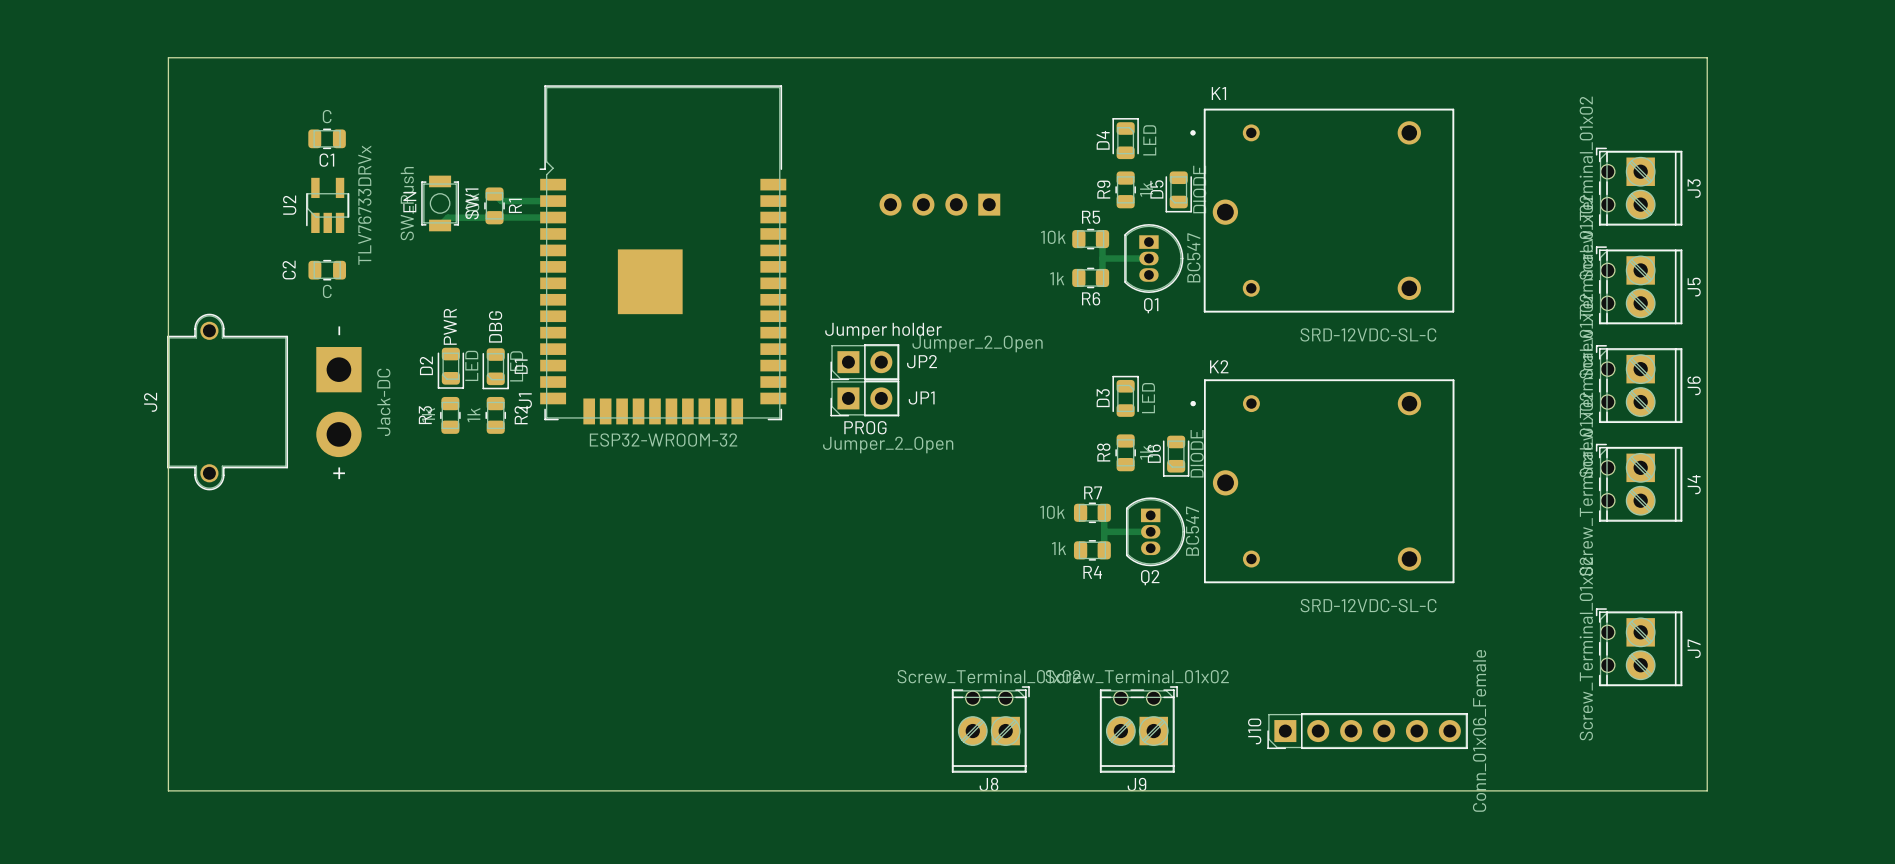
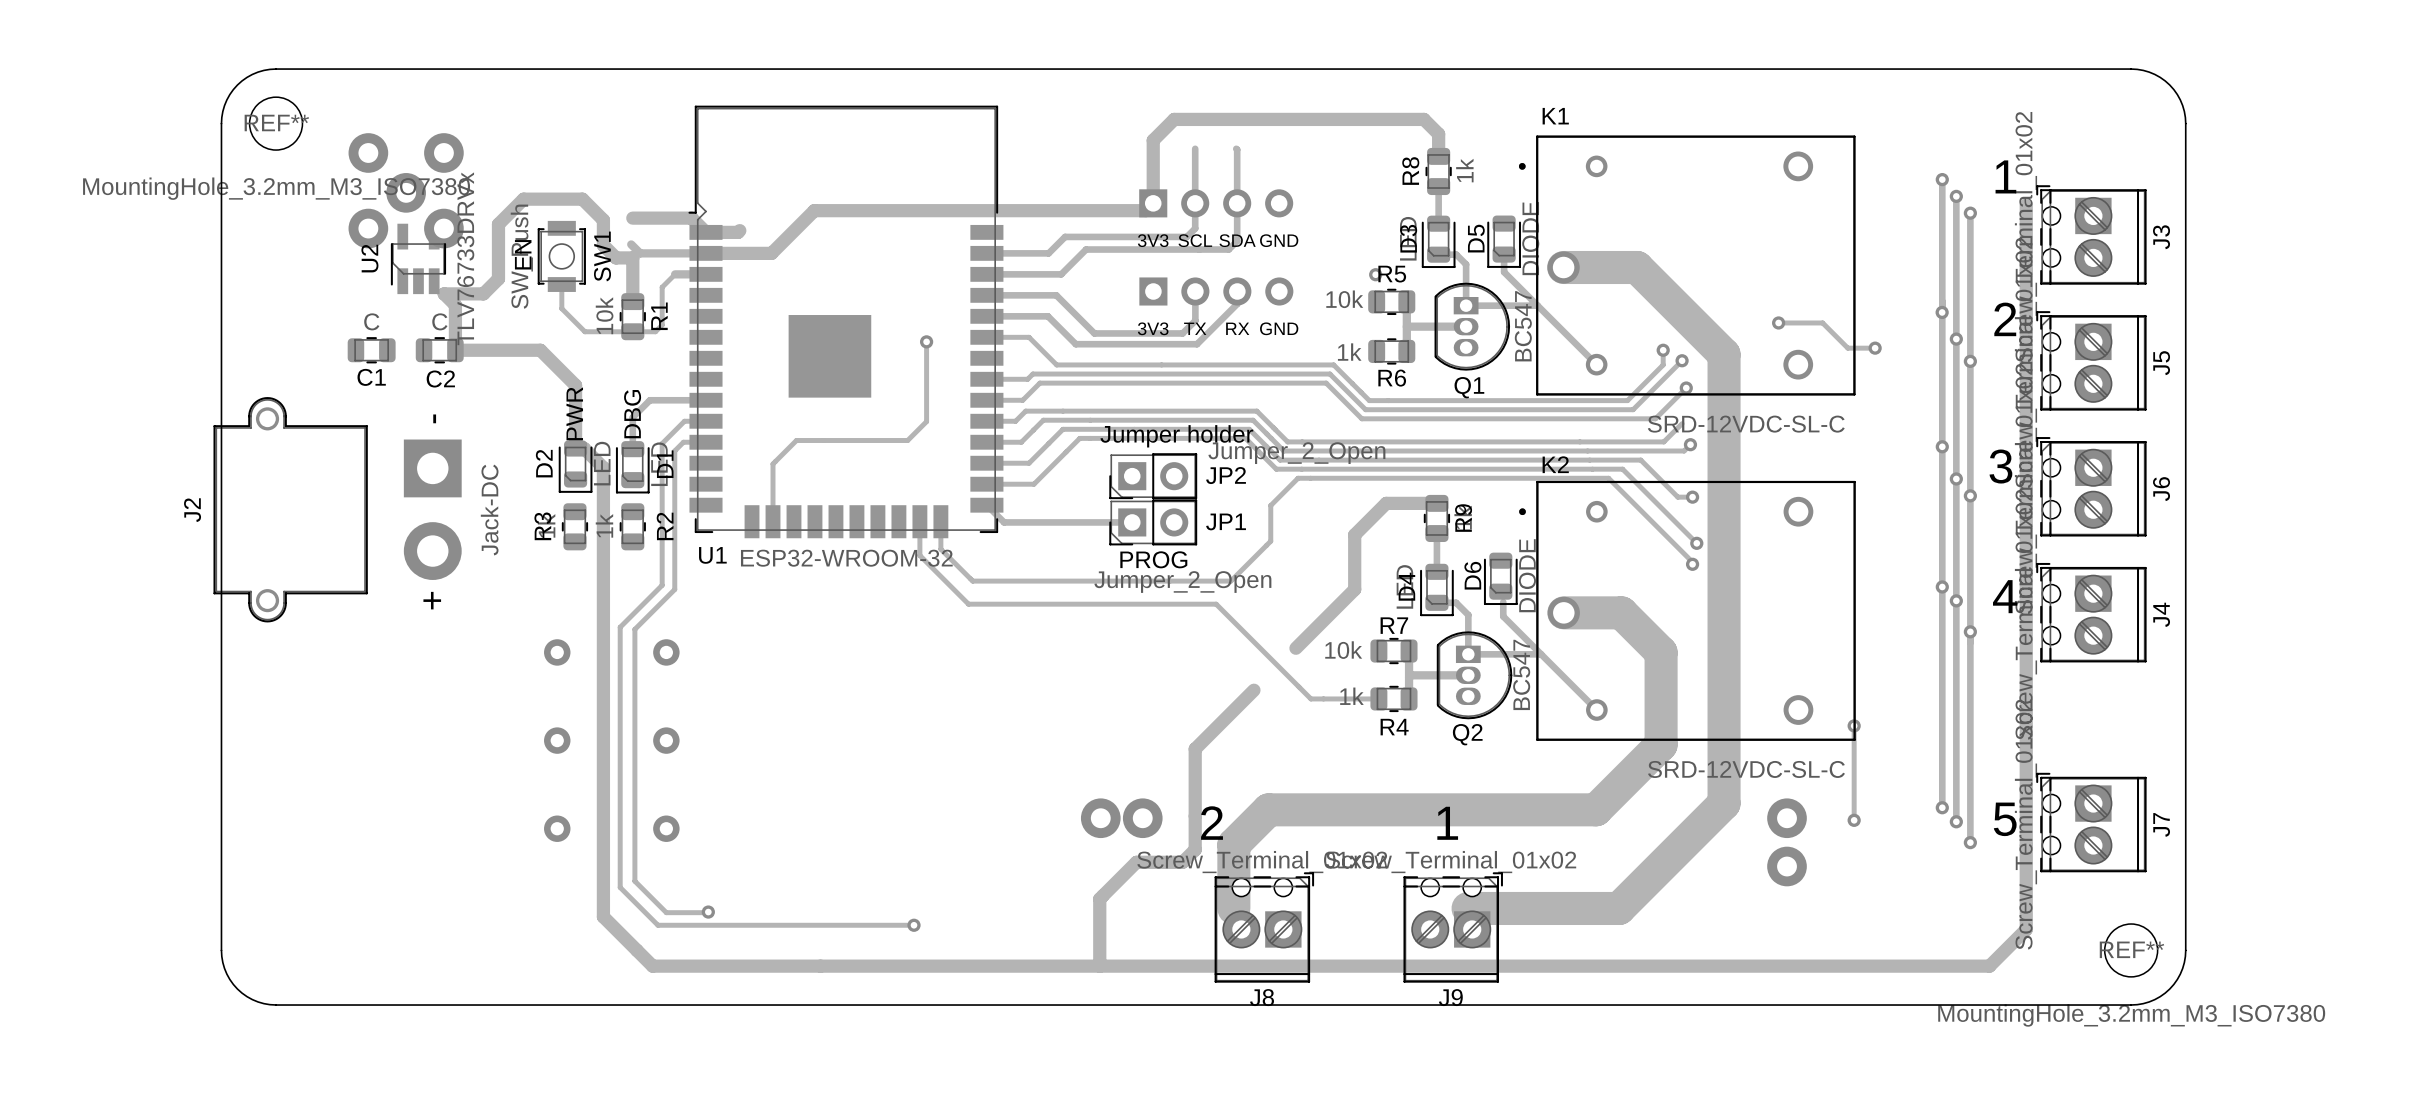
board edge: (168, 57) (1707, 57) (1707, 790) (168, 790) (168, 57) -> (276, 69) (258, 72) (237, 85) (226, 99) (221, 123) (221, 950) (222, 962) (229, 979) (242, 993) (252, 999) (276, 1005) (2131, 1005) (2149, 1001) (2160, 996) (2173, 984) (2180, 974) (2185, 950) (2185, 123) (2184, 111) (2177, 94) (2169, 85) (2154, 74) (2131, 69) (276, 69)
REF**: none -> MountingHole_3.2mm_M3_ISO7380 (276, 123)
track: none -> (1195, 148) (1195, 228) (1186, 236) (1065, 236) (1048, 253) (986, 253)
track: none -> (1236, 148) (1237, 241) (1228, 249) (1086, 249) (1061, 274) (986, 274)
via: none -> (368, 152)
via: none -> (443, 152)
track: none -> (1438, 156) (1438, 134) (1423, 119) (1174, 119) (1153, 140) (1153, 203) (1145, 210) (814, 210) (771, 253) (705, 253)
C1 position: (327, 138) -> (371, 350)
D4 rotation: 0° (1125, 138) -> 180° (1436, 589)
D4 position: (1125, 138) -> (1436, 589)
text: none -> 1 (2005, 176)
track: none -> (1942, 179) (1942, 807)
via: none -> (1942, 179)
track: none -> (1438, 186) (1438, 223)
via: none -> (406, 192)
track: none -> (1956, 196) (1956, 821)
via: none -> (1956, 196)
part: none -> (1216, 203)
track: none -> (2026, 204) (2026, 929) (1989, 966) (652, 966) (603, 916) (603, 467) (584, 448) (575, 448) (575, 385) (540, 350) (455, 350) (455, 305) (444, 293) (483, 293) (498, 278) (498, 224) (523, 199) (582, 199) (603, 220) (603, 245) (616, 257) (632, 257) (632, 301)
track: none -> (1970, 213) (1970, 842)
via: none -> (1970, 213)
track: none -> (632, 218) (691, 218) (705, 232) (738, 232) (739, 230)
via: none -> (368, 228)
via: none -> (443, 228)
R9 name position: R9 (1103, 189) -> R9 (1463, 518)
R9 position: (1125, 189) -> (1436, 518)
text: none -> 3V3 (1153, 240)
text: none -> SCL (1195, 240)
text: none -> SDA (1237, 240)
text: none -> GND (1279, 240)
track: none -> (1438, 254) (1456, 254) (1466, 264) (1466, 305) (1537, 305)
track: none -> (1504, 254) (1504, 272) (1596, 364)
part: (939, 204) -> none
R1 position: (494, 205) -> (632, 316)
track: none -> (1563, 267) (1637, 267) (1724, 354) (1724, 803) (1619, 908) (1468, 908)
track: (528, 217) (447, 217) (440, 225) -> (675, 274) (662, 287) (662, 325) (655, 331) (584, 331) (561, 308) (561, 284)
via: none -> (1375, 274)
track: none -> (1195, 291) (1195, 320) (1182, 333) (1094, 333) (1056, 295) (986, 295)
part: none -> (1216, 291)
track: none -> (1237, 291) (1237, 303) (1197, 344) (1075, 344) (1047, 316) (986, 316)
via: none -> (1942, 312)
text: none -> 2 (2005, 319)
track: none -> (1778, 322) (1822, 322) (1847, 348) (1875, 348)
via: none -> (1778, 322)
text: none -> 3V3 (1153, 328)
text: none -> TX (1195, 328)
text: none -> RX (1237, 328)
text: none -> GND (1279, 328)
track: none -> (986, 337) (1029, 337) (1056, 364) (1333, 364) (1369, 400) (1627, 400) (1663, 364) (1663, 350)
via: none -> (1956, 339)
C2 name rotation: 0° (289, 270) -> 90° clockwise (440, 379)
C2 name position: C2 (289, 270) -> C2 (440, 379)
C2 position: (327, 270) -> (439, 350)
track: none -> (926, 341) (926, 421) (907, 440) (796, 440) (773, 463) (773, 521)
via: none -> (926, 341)
via: none -> (1875, 348)
via: none -> (1663, 350)
track: none -> (1682, 360) (1633, 409) (1365, 409) (1329, 374) (1032, 374) (1027, 379) (986, 379)
via: none -> (1682, 360)
via: none -> (1970, 361)
C2 value position: C (327, 291) -> C (439, 321)
track: none -> (1686, 388) (1655, 418) (1361, 418) (1326, 383) (1039, 383) (1022, 400) (986, 400)
via: none -> (1686, 388)
track: none -> (705, 400) (649, 400) (632, 417) (632, 449)
track: none -> (705, 421) (684, 421) (662, 443) (662, 585) (620, 627) (620, 887) (657, 925) (914, 925)
track: none -> (986, 421) (1015, 421) (1025, 411) (1256, 411) (1287, 441) (1663, 441) (1682, 423)
track: none -> (705, 442) (683, 442) (674, 450) (674, 589) (634, 629) (634, 881) (666, 912) (708, 912)
track: none -> (986, 442) (1021, 442) (1043, 420) (1253, 420) (1283, 451) (1684, 451) (1690, 444)
via: none -> (1690, 444)
via: none -> (1942, 446)
JP2 position: (864, 362) -> (1153, 476)
track: none -> (986, 463) (1029, 463) (1062, 429) (1249, 429) (1280, 460) (1640, 460) (1677, 497) (1692, 497)
text: none -> 3 (2000, 466)
via: none -> (1956, 478)
track: none -> (986, 484) (1033, 484) (1079, 438) (1245, 438) (1276, 469) (1622, 469) (1696, 543)
via: none -> (1970, 495)
via: none -> (1692, 497)
D3 rotation: 0° (1125, 396) -> 180° (1438, 241)
D3 position: (1125, 396) -> (1438, 241)
track: none -> (1436, 503) (1386, 503) (1354, 534) (1354, 589) (1295, 648)
track: none -> (986, 505) (1004, 522) (1132, 522)
JP1 position: (864, 398) -> (1153, 522)
U1 name rotation: 0° (525, 400) -> 90° clockwise (712, 555)
U1 name position: U1 (525, 400) -> U1 (712, 555)
track: none -> (919, 521) (919, 555) (968, 604) (1216, 604) (1310, 698) (1378, 698)
track: none -> (940, 521) (940, 549) (972, 581) (1230, 581) (1270, 541) (1270, 505) (1298, 478) (1608, 478) (1692, 564)
track: none -> (1436, 533) (1436, 571)
via: none -> (1696, 543)
via: none -> (1692, 564)
R8 position: (1125, 452) -> (1438, 171)
via: none -> (1942, 586)
text: none -> 4 (2005, 596)
via: none -> (1956, 600)
track: none -> (1436, 602) (1456, 602) (1468, 614) (1468, 654) (1541, 654)
track: none -> (1503, 602) (1503, 616) (1596, 710)
track: none -> (1563, 612) (1621, 612) (1661, 652) (1661, 744) (1596, 809) (1268, 809) (1233, 844) (1233, 908)
via: none -> (1970, 631)
via: none -> (557, 652)
via: none -> (666, 652)
track: none -> (1253, 690) (1195, 748) (1195, 849) (1182, 862) (1136, 862) (1099, 898) (1099, 966)
track: none -> (1854, 725) (1854, 820)
via: none -> (1854, 725)
via: none -> (557, 740)
via: none -> (666, 740)
via: none -> (1942, 807)
via: none -> (1100, 818)
via: none -> (1142, 818)
via: none -> (1787, 818)
text: none -> 5 (2005, 819)
via: none -> (1854, 820)
via: none -> (1956, 821)
text: none -> 2 (1212, 823)
text: none -> 1 (1447, 823)
via: none -> (557, 828)
via: none -> (666, 828)
via: none -> (1970, 842)
via: none -> (1787, 866)
via: none -> (708, 912)
via: none -> (914, 925)
J10: Conn_01x06_Female (1367, 731) -> none
REF**: none -> MountingHole_3.2mm_M3_ISO7380 (2131, 950)

